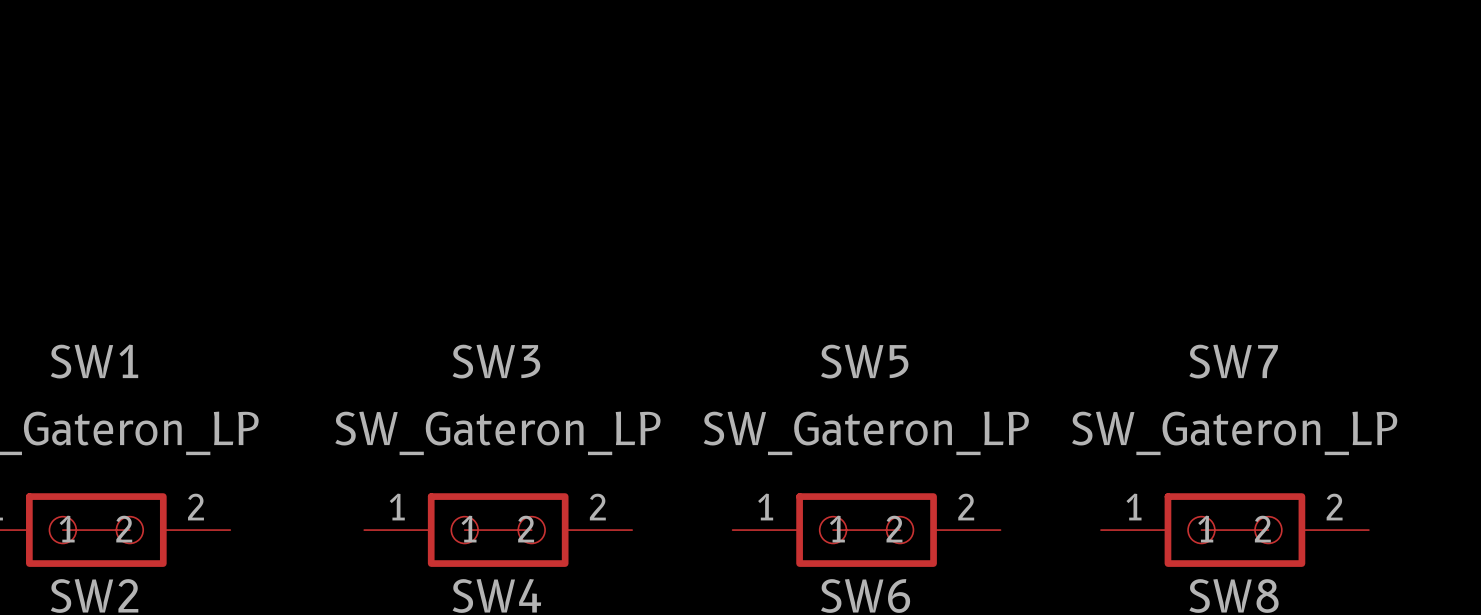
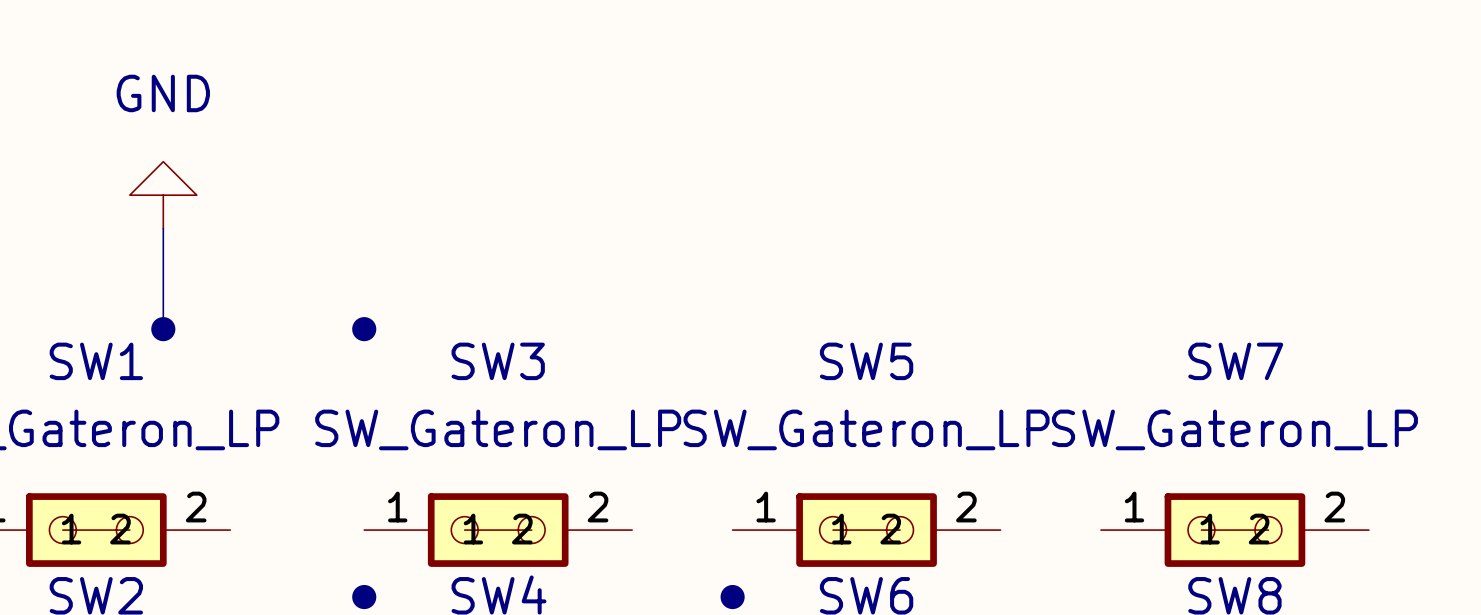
power symbol: none -> GND (163, 195)
wire: none -> (163, 228) (163, 329)
junction: none -> (163, 329)
junction: none -> (364, 329)
junction: none -> (364, 597)
junction: none -> (732, 597)

